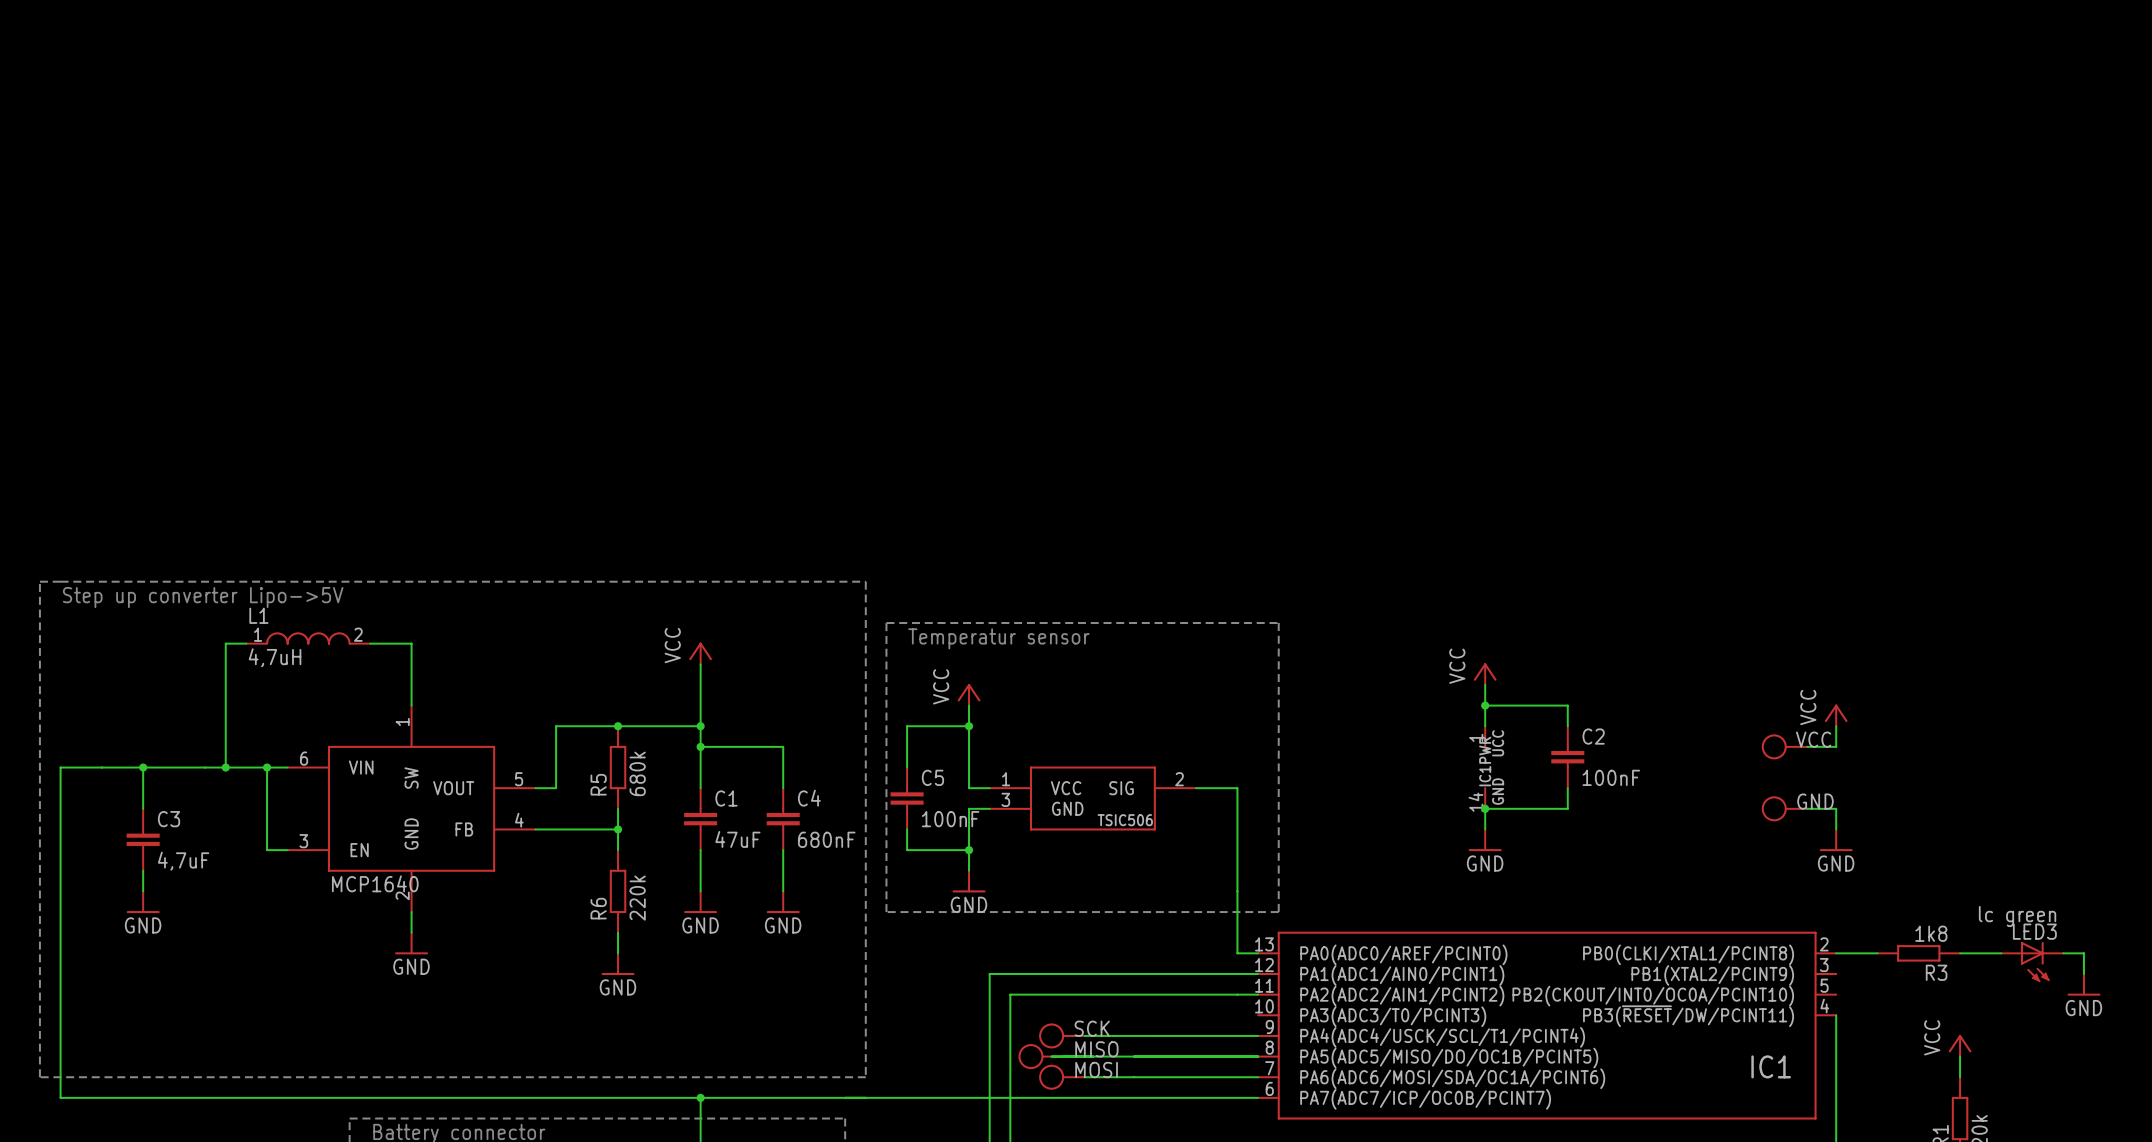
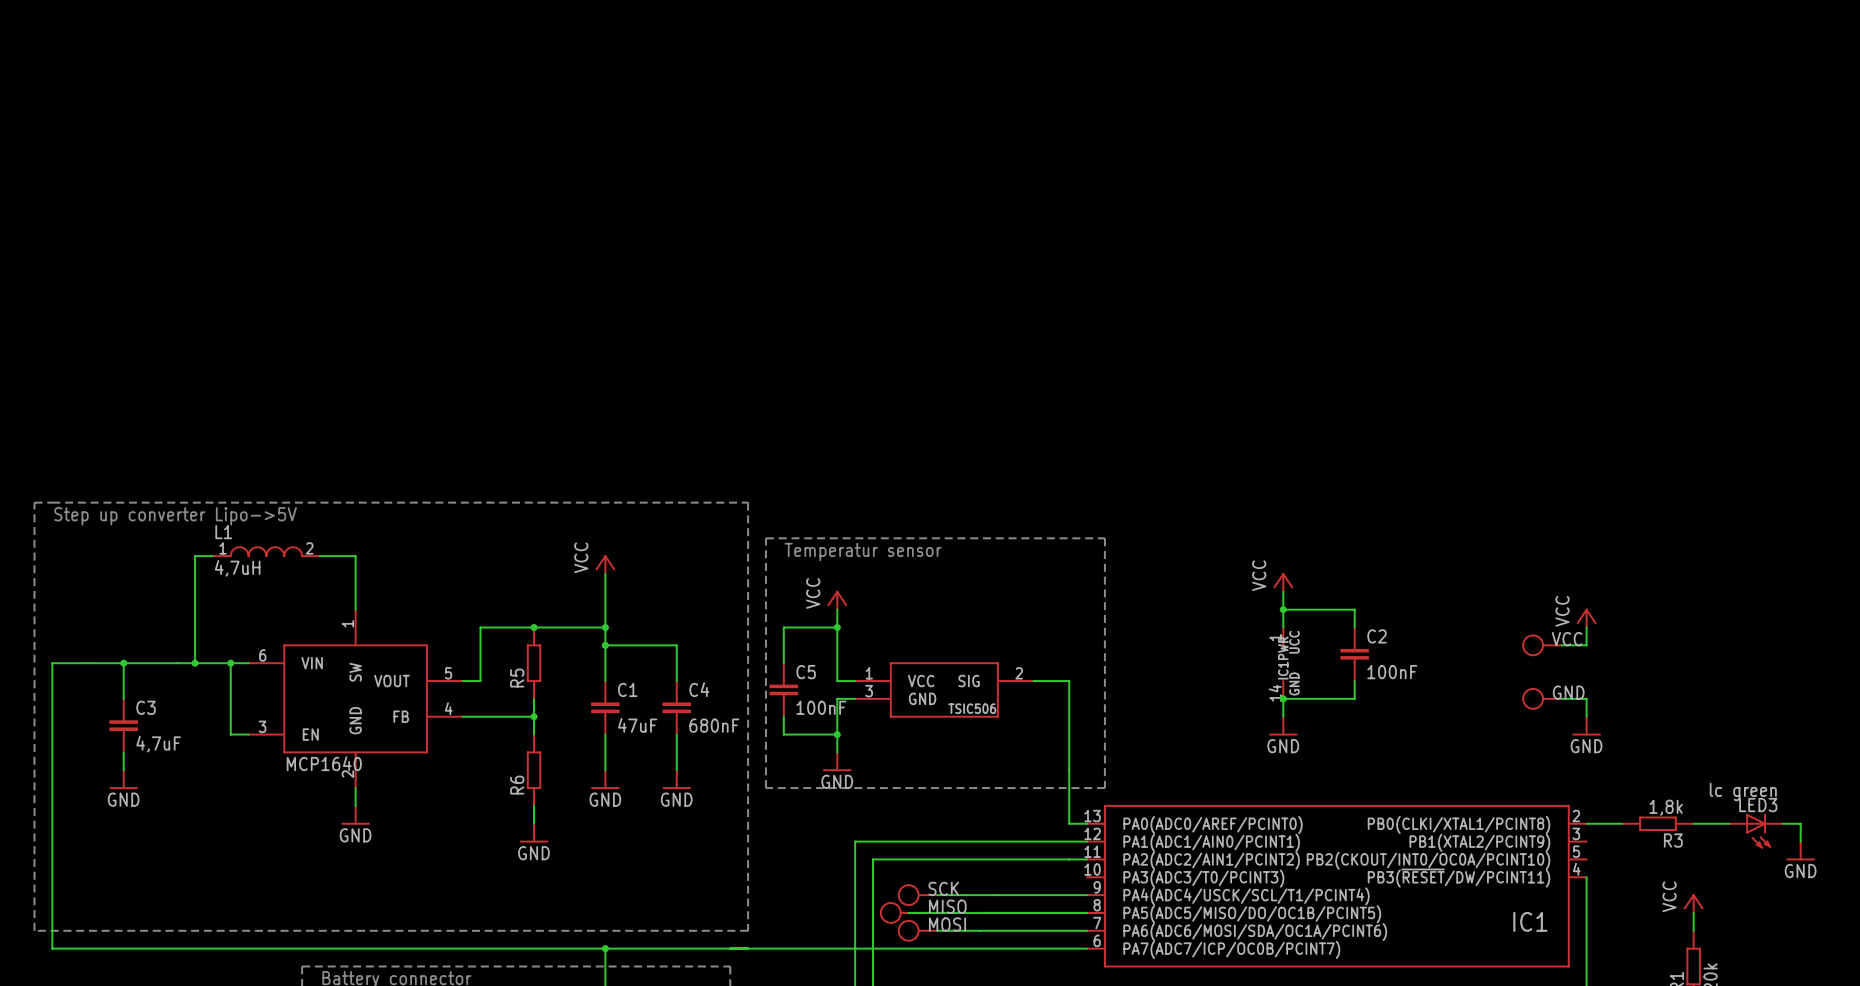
R5 value: 680k (637, 773) -> none
R6 value: 220k (637, 898) -> none
R3 value: 1k8 (1931, 933) -> 1,8k (1666, 807)

